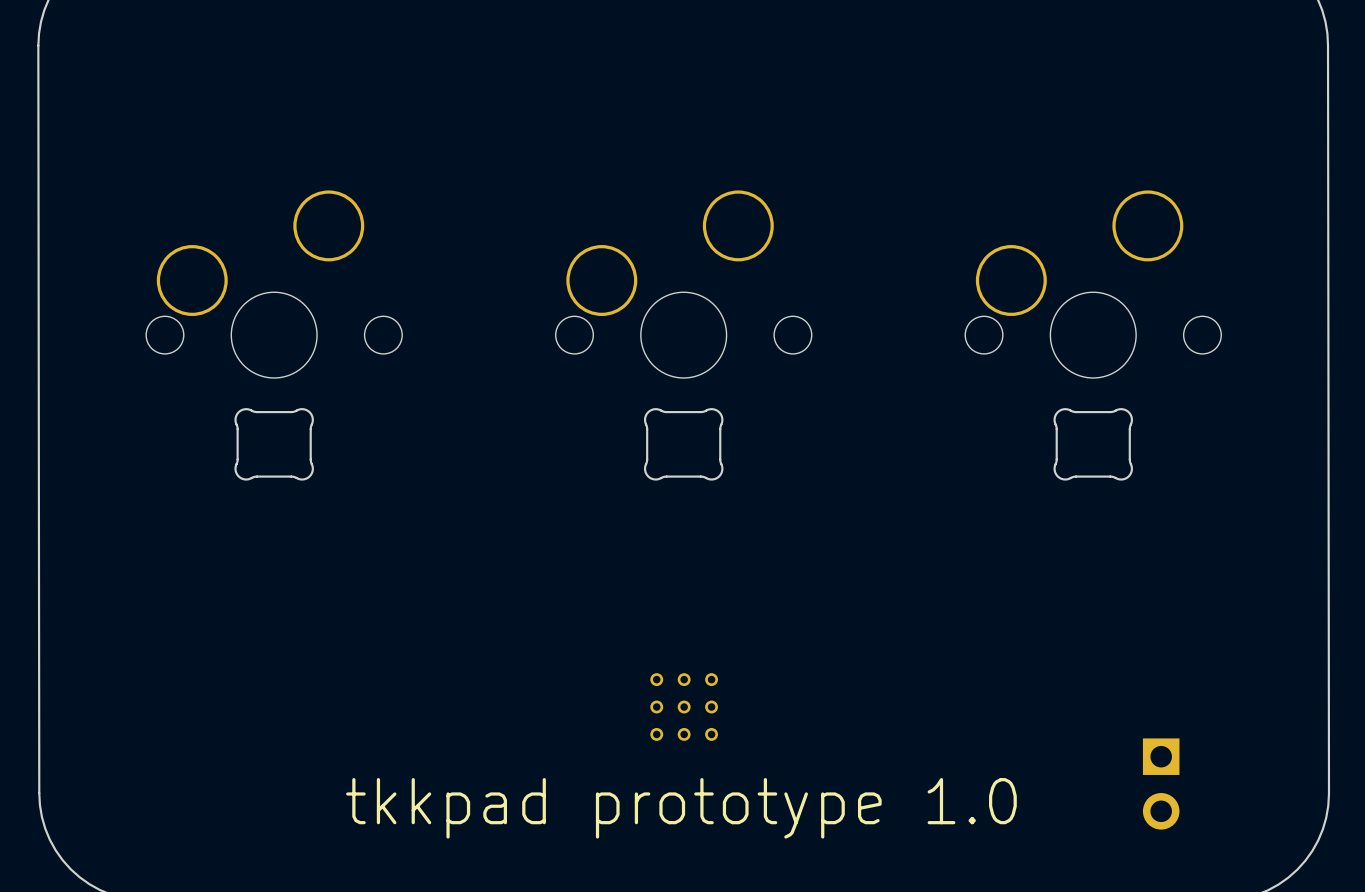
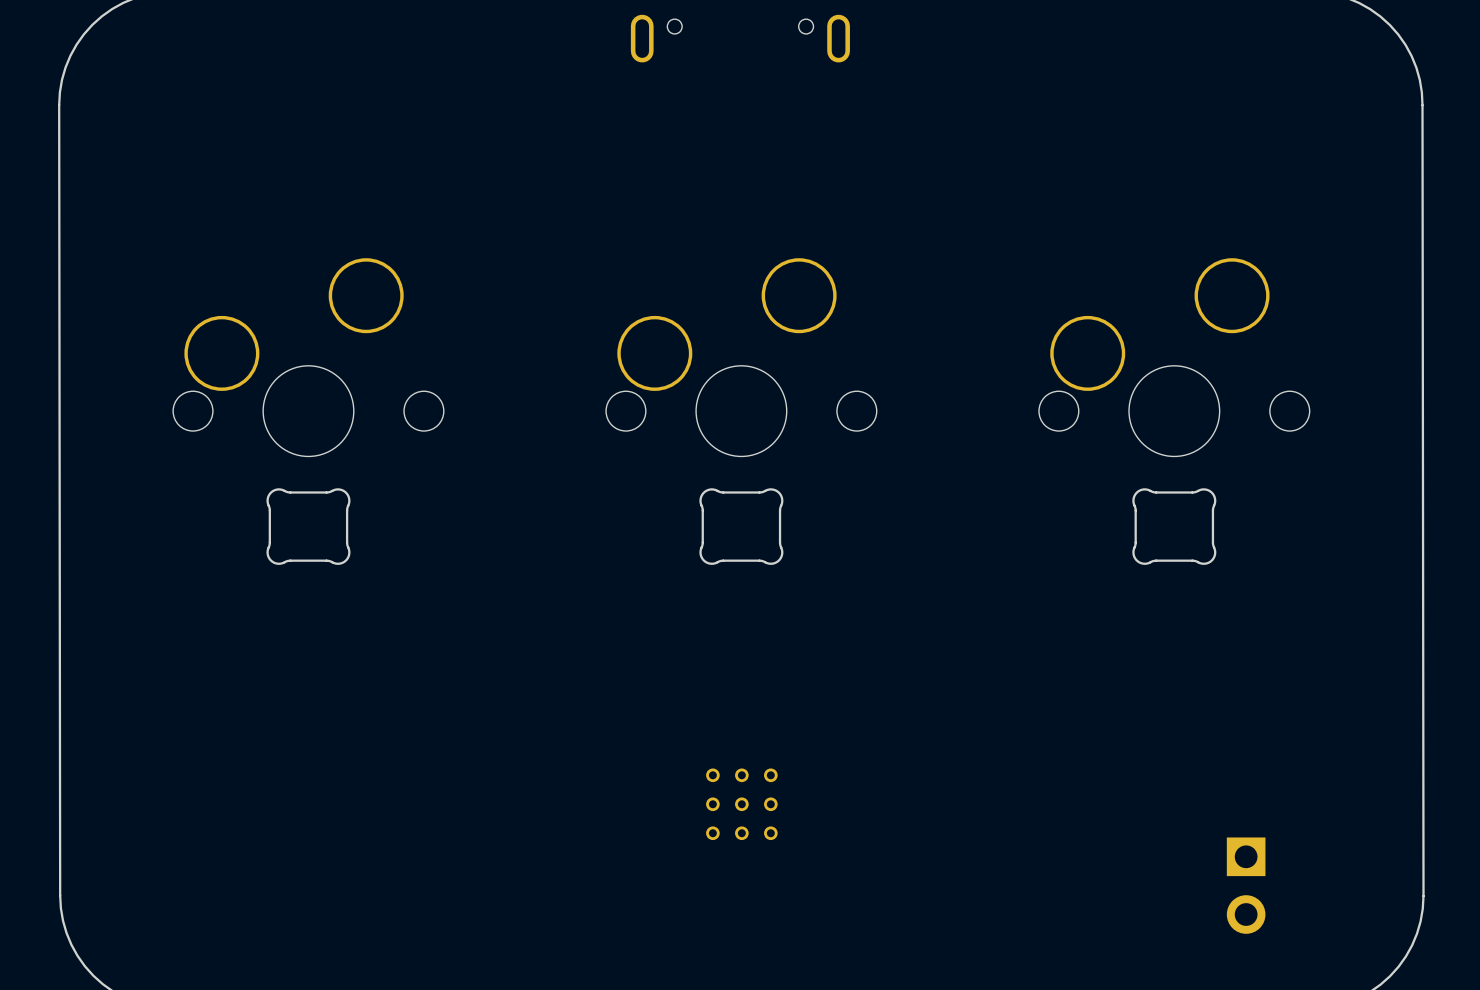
text: tkkpad prototype 1.0 (681, 808) -> none

